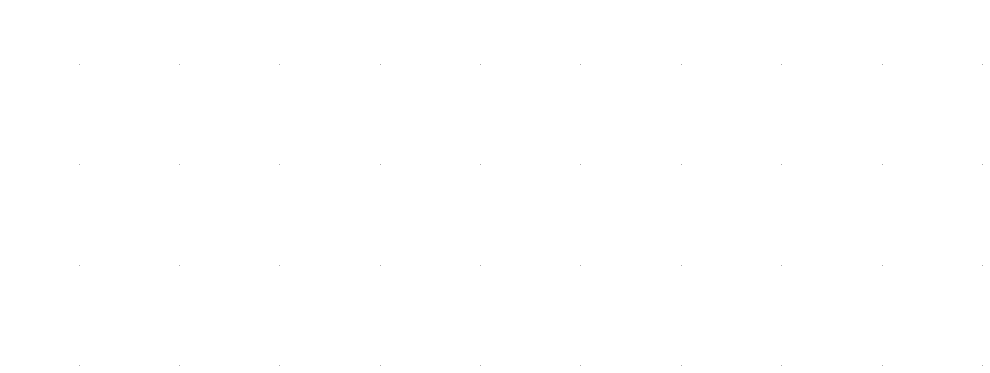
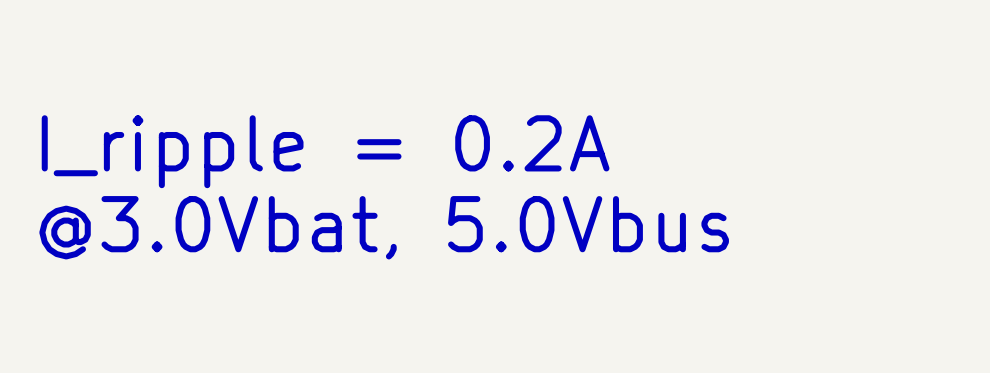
text: none -> I_ripple = 0.2A (325, 151)
text: none -> @3.0Vbat, 5.0Vbus (384, 227)

